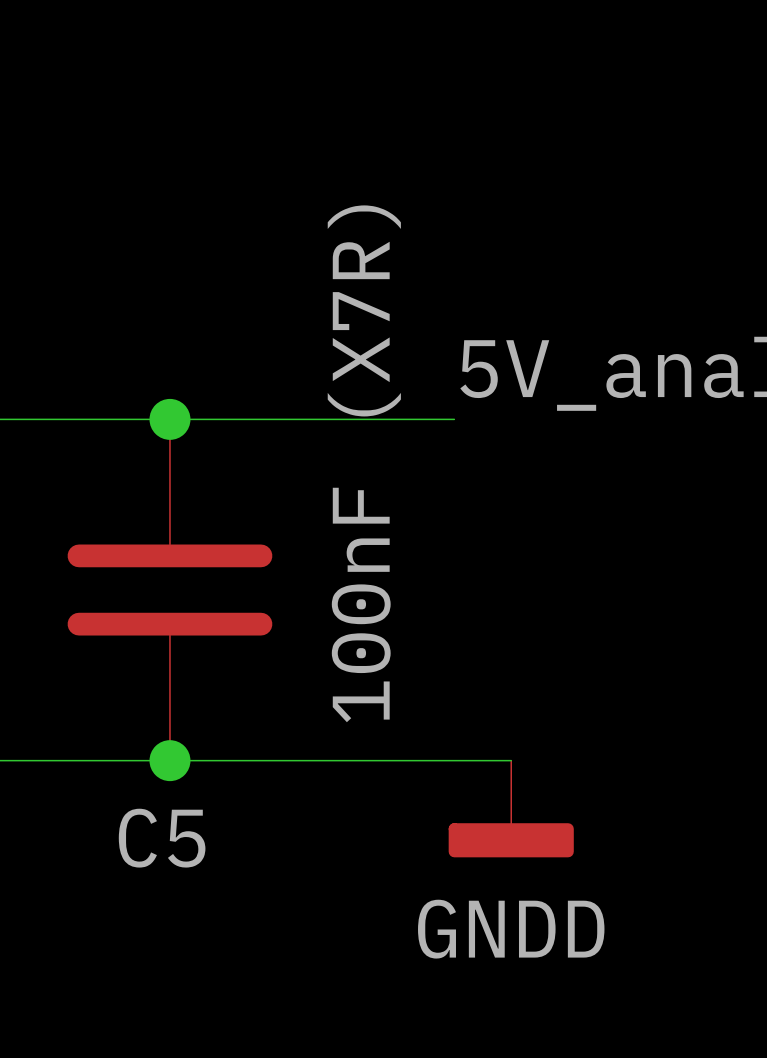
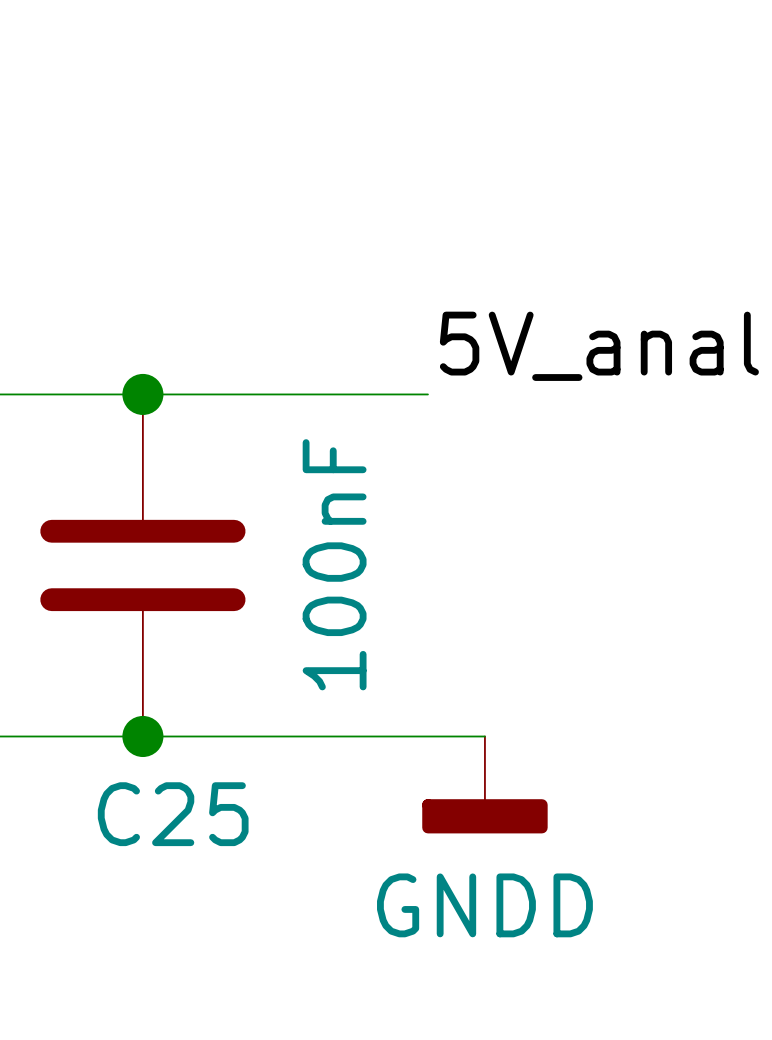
C5 value: 100nF (X7R) (364, 463) -> 100nF (334, 564)
C5 name: C5 (162, 838) -> C25 (173, 814)

